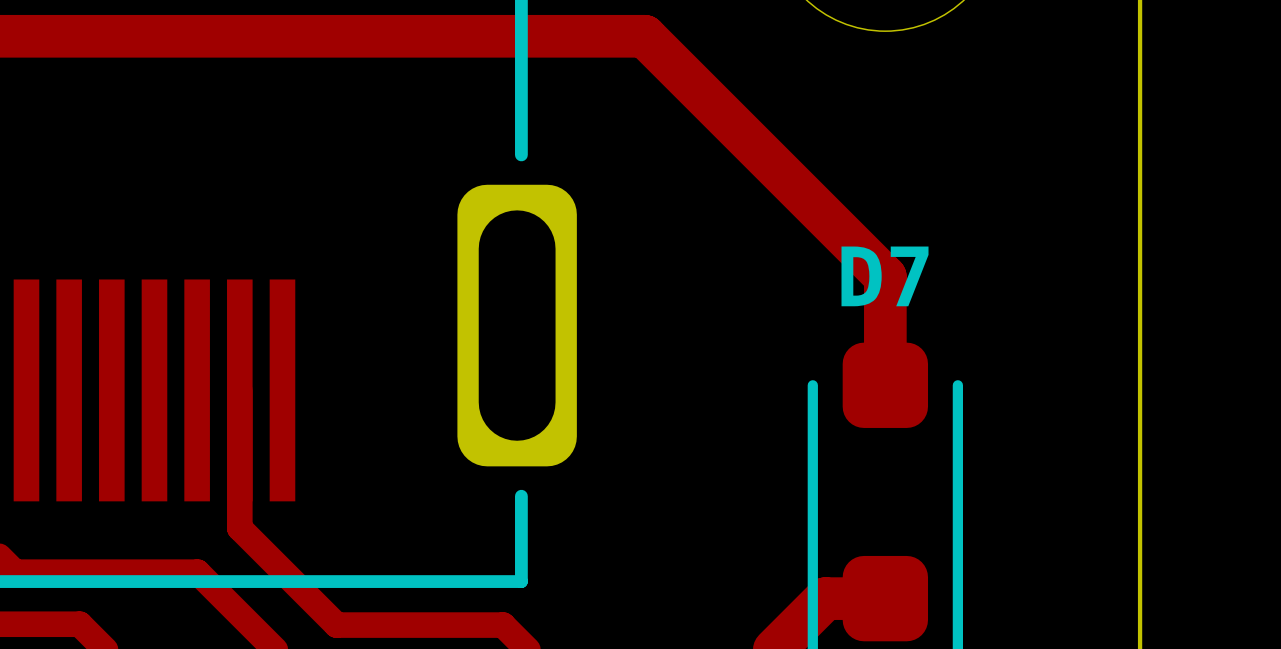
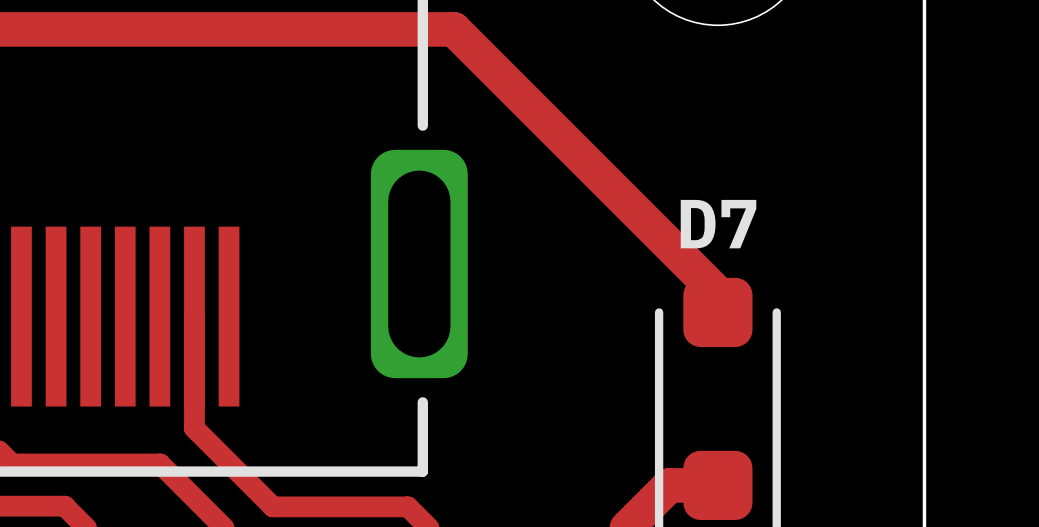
top track: (559, 36) (644, 36) (885, 276) (885, 361) -> (453, 29) (717, 293)

